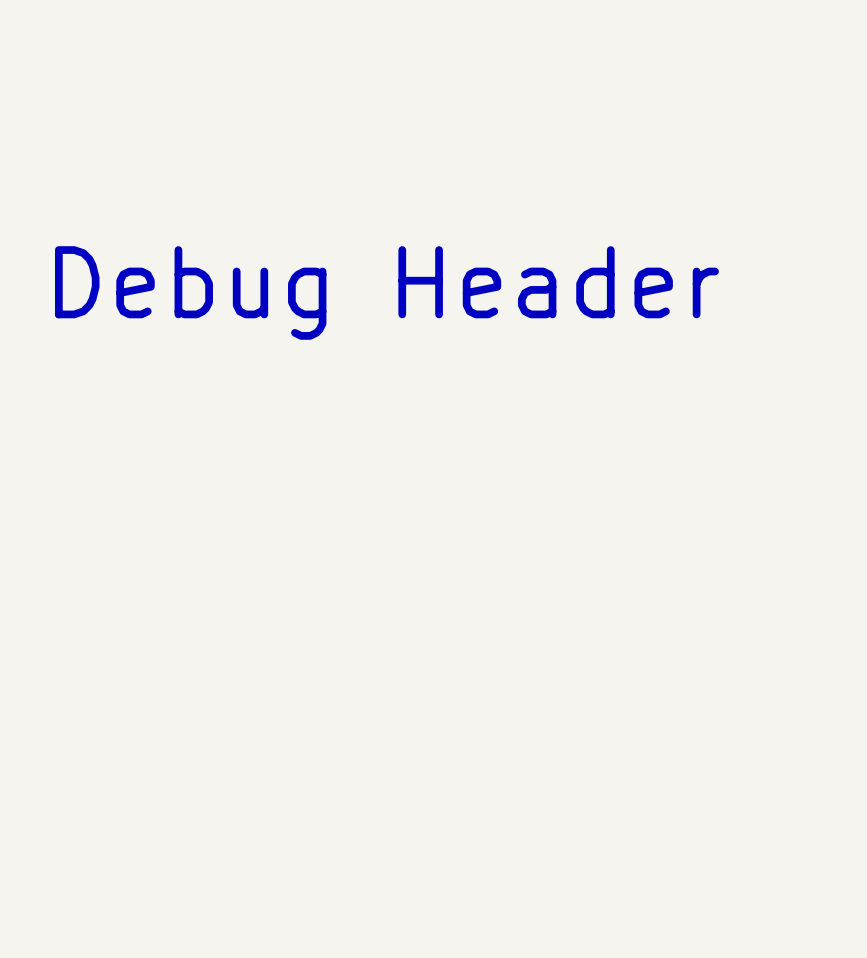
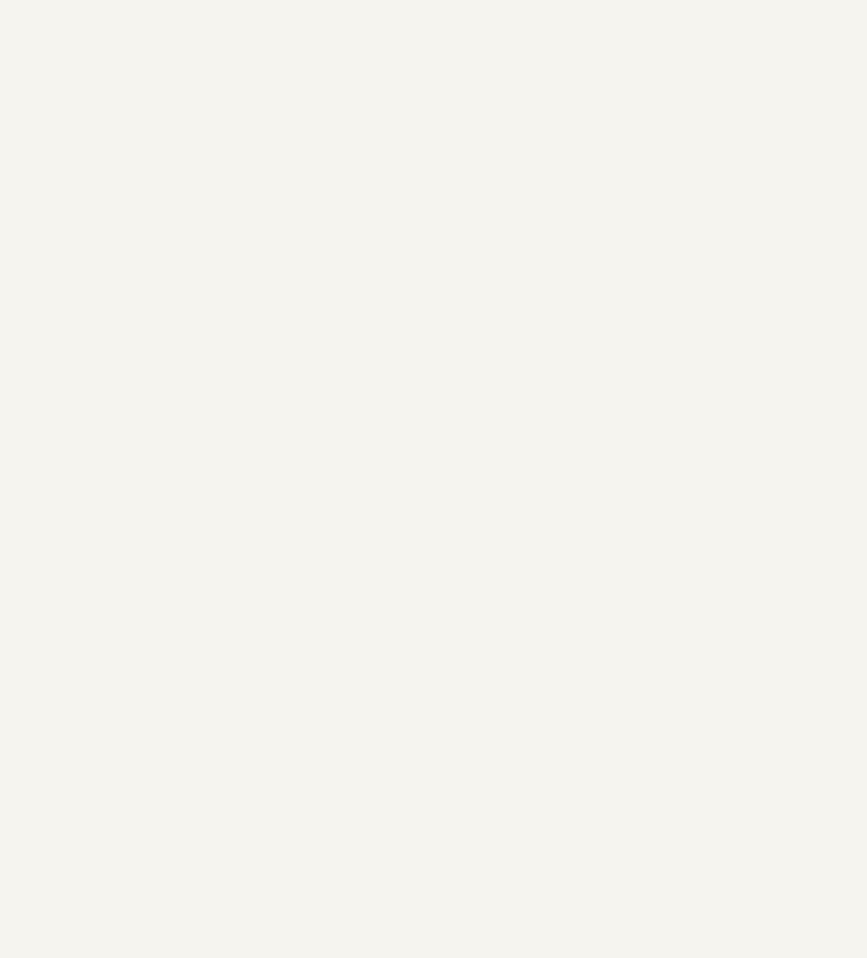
text: Debug Header (386, 292) -> none

